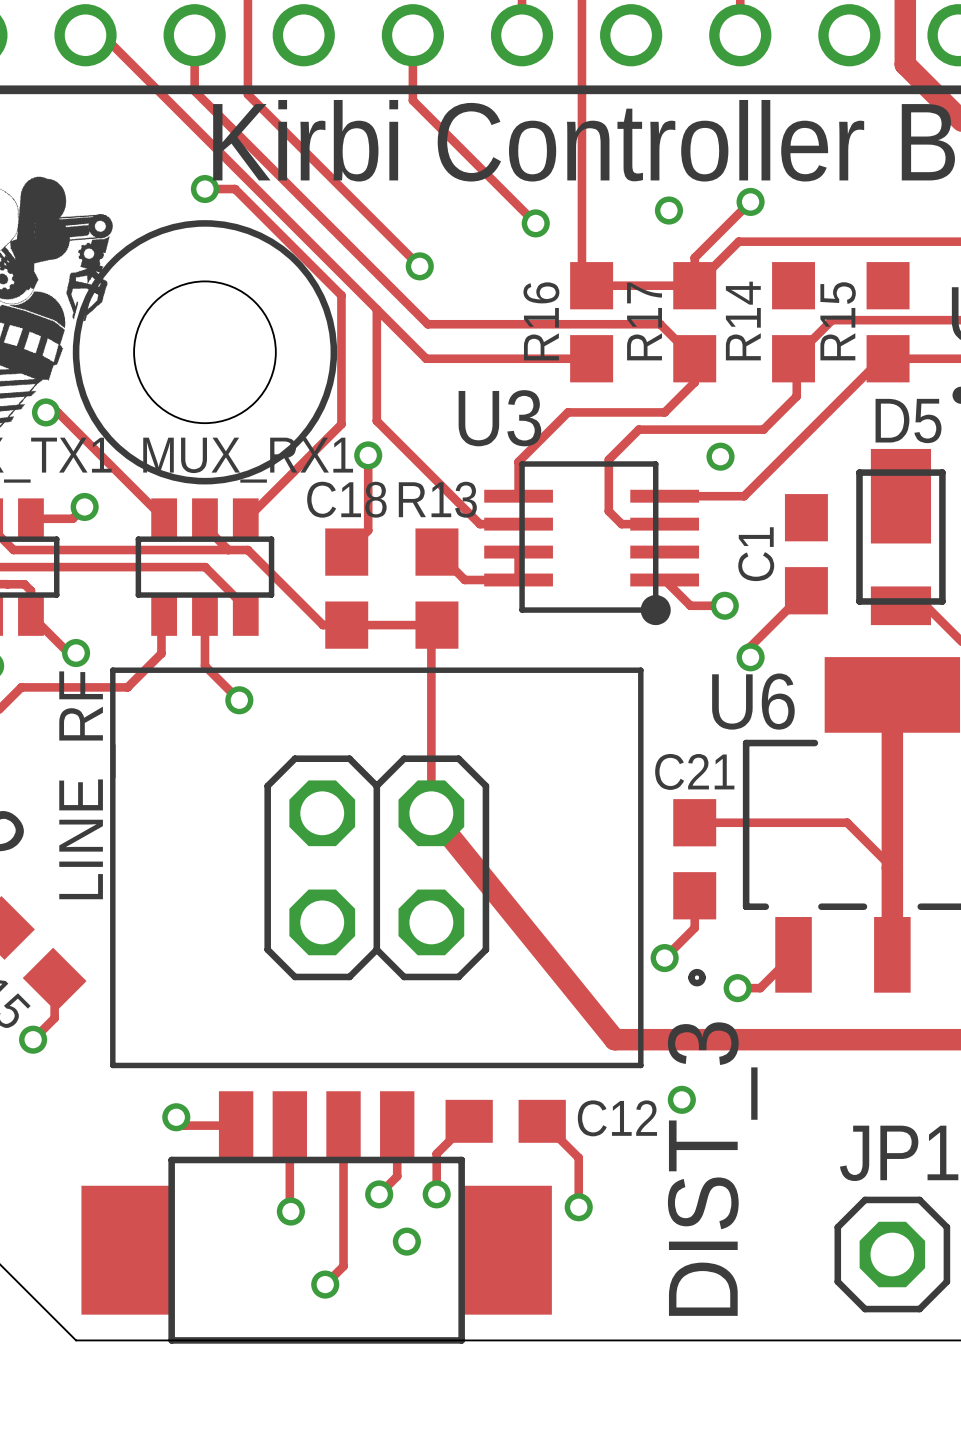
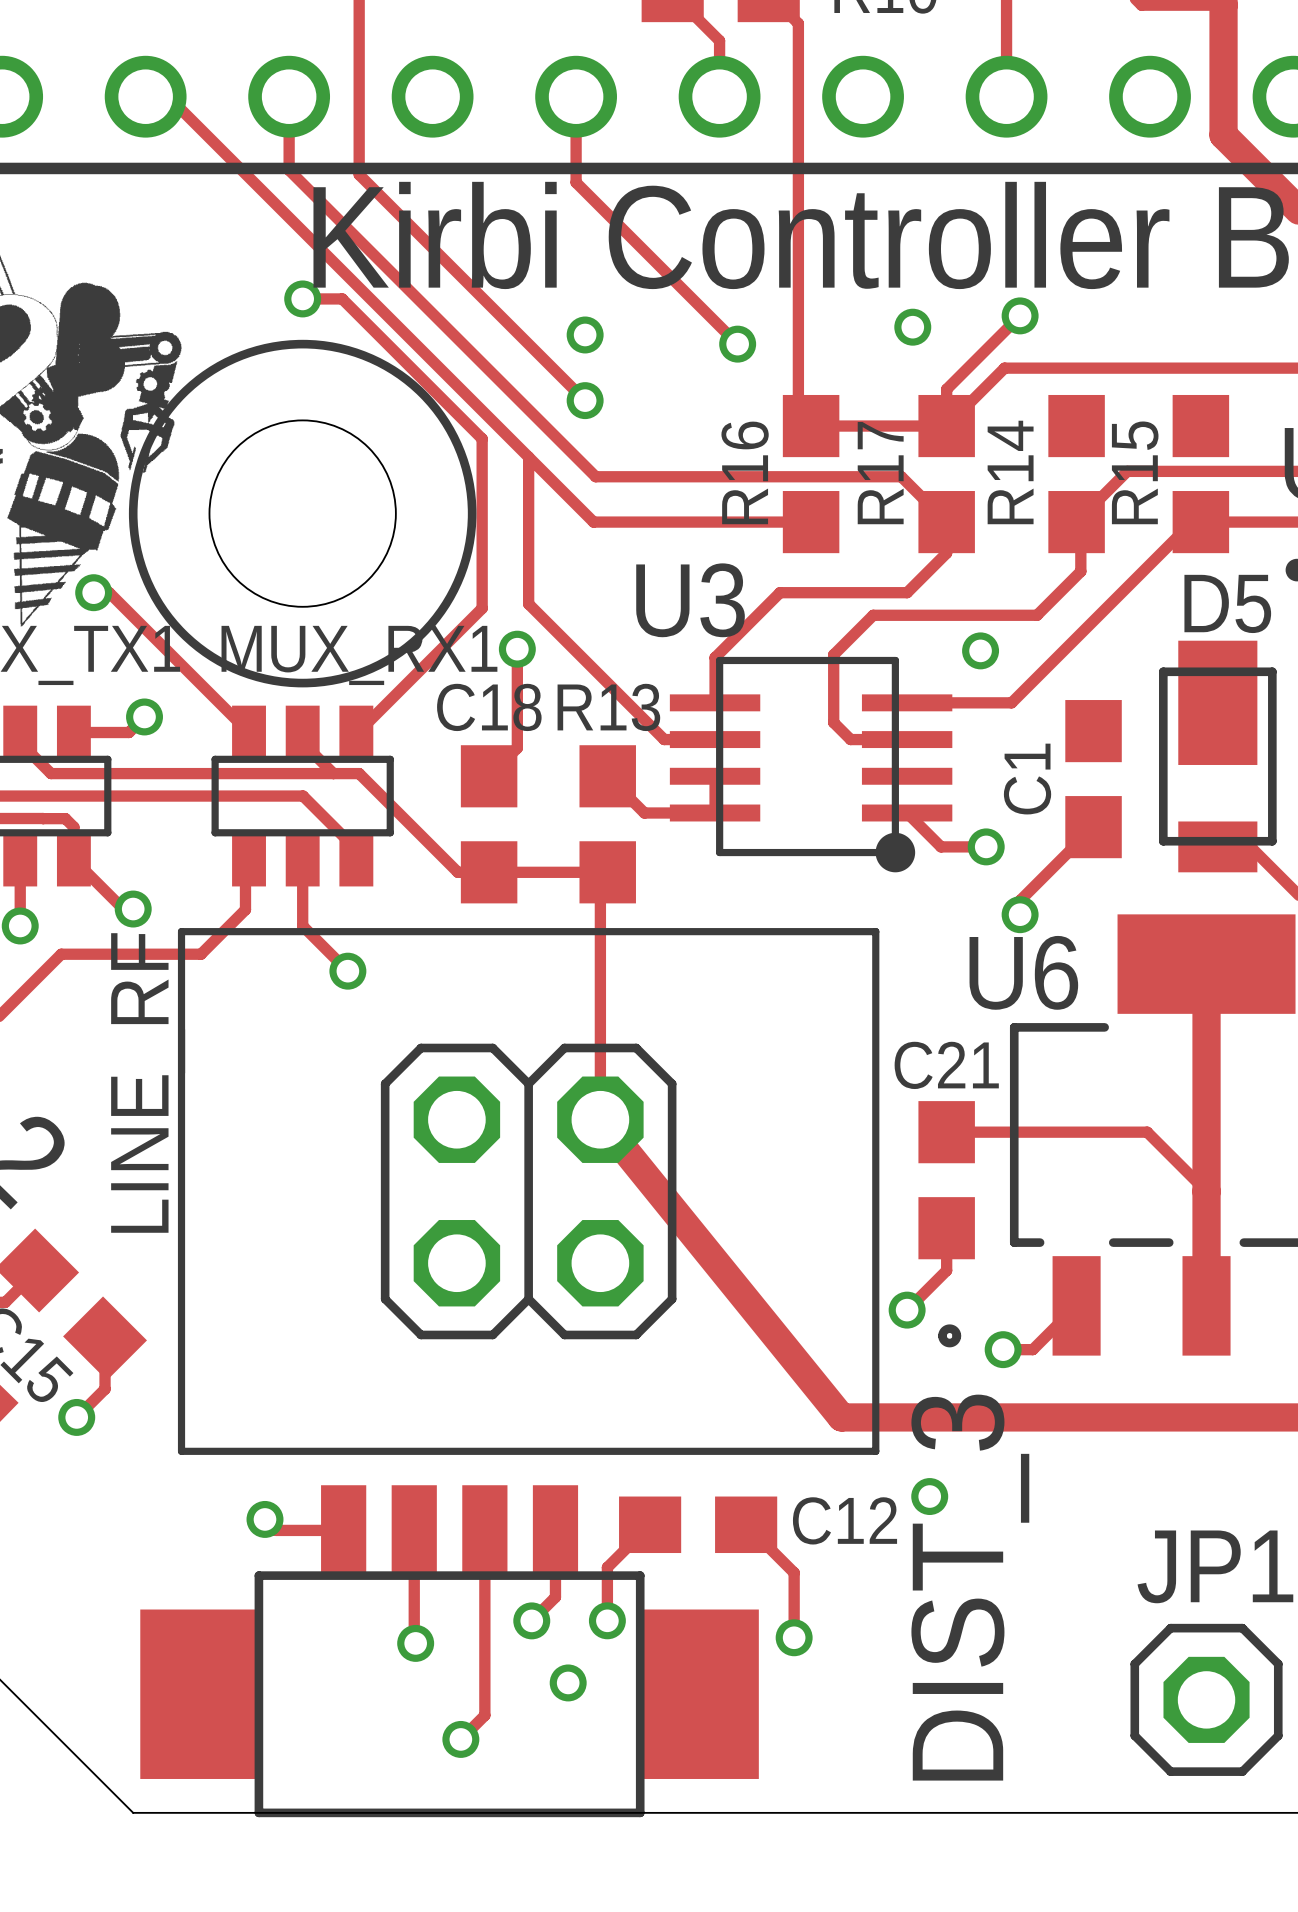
via: none -> (585, 334)

